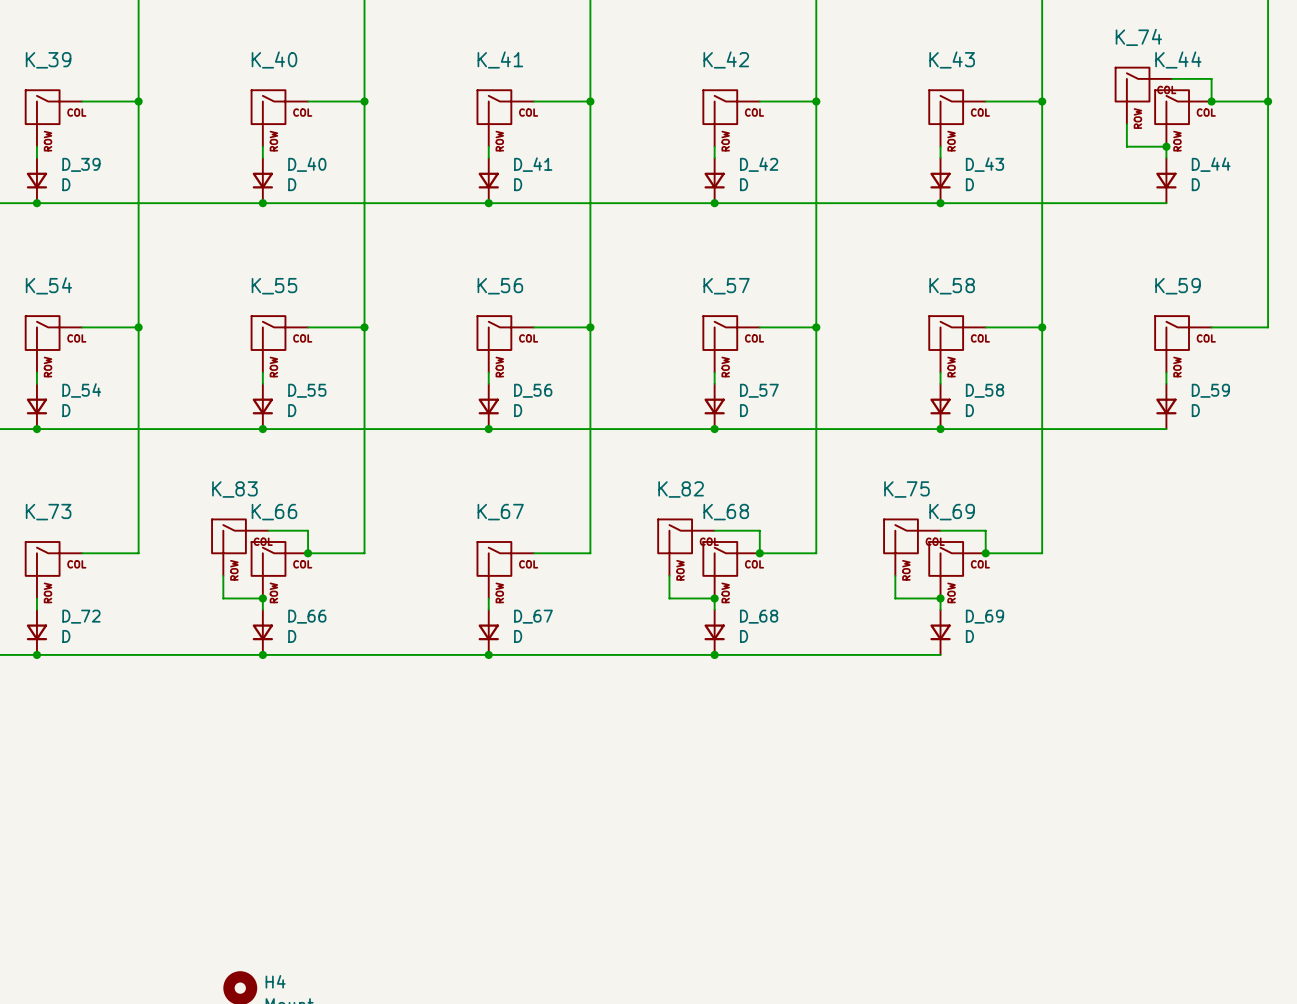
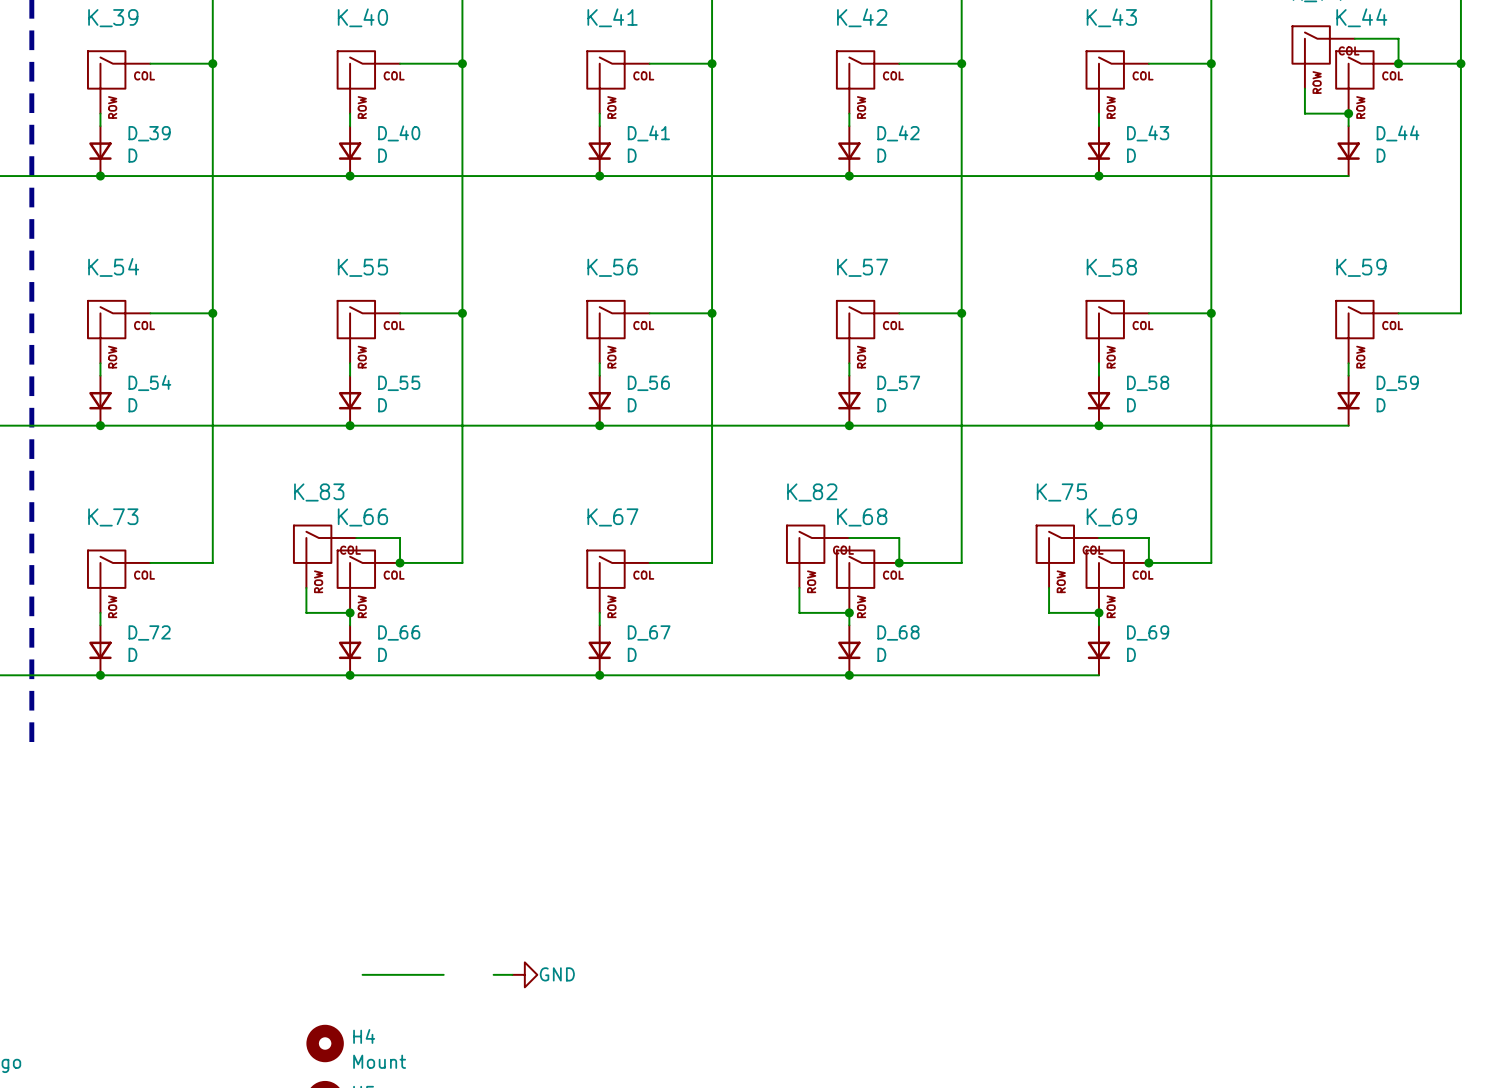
wire: none -> (362, 974) (443, 974)
wire: none -> (493, 974) (512, 974)
power symbol: none -> GND (524, 974)

